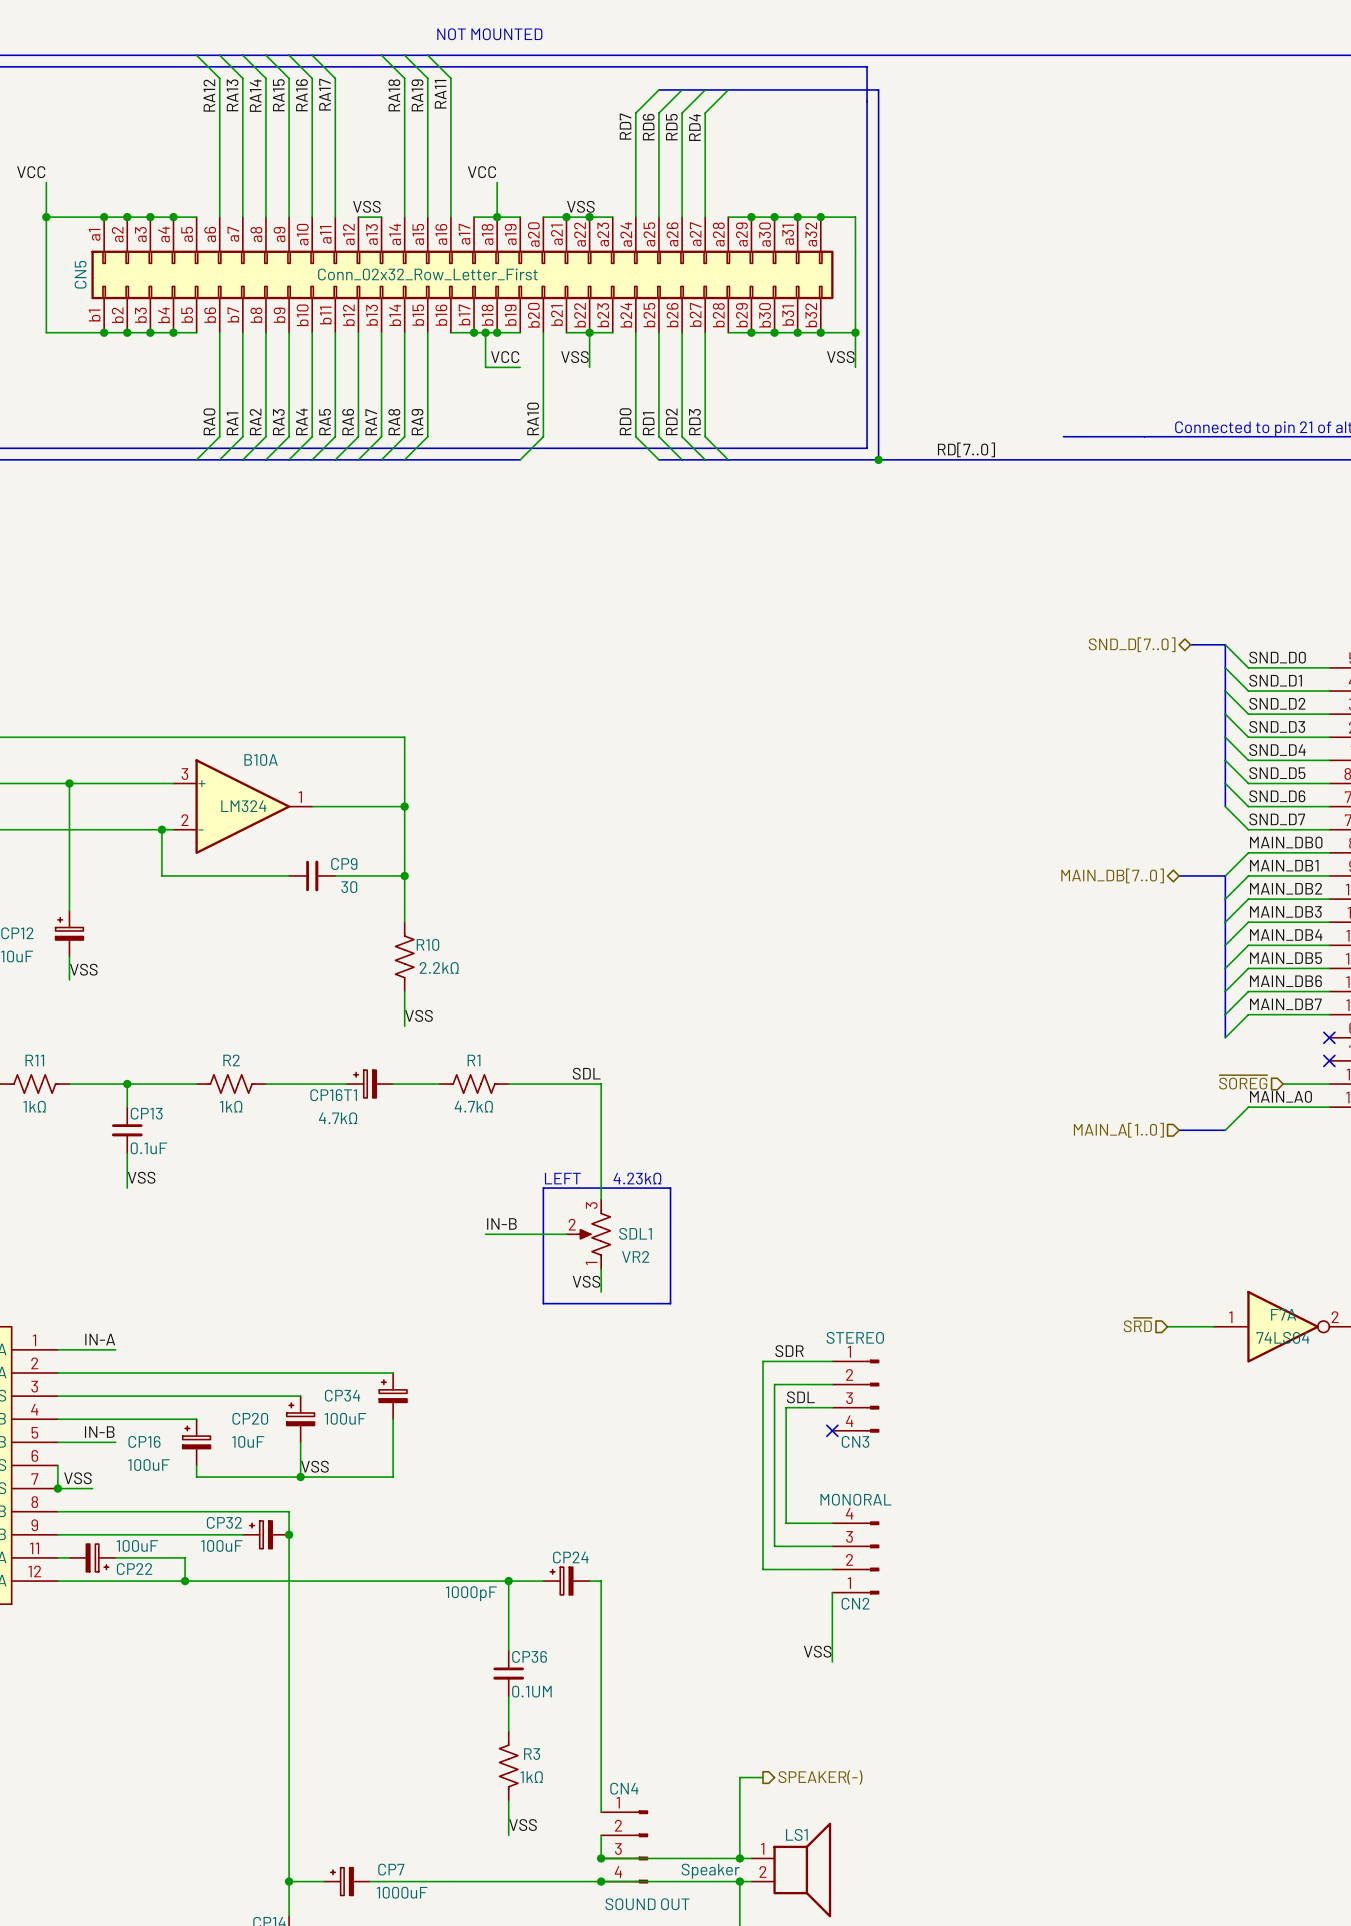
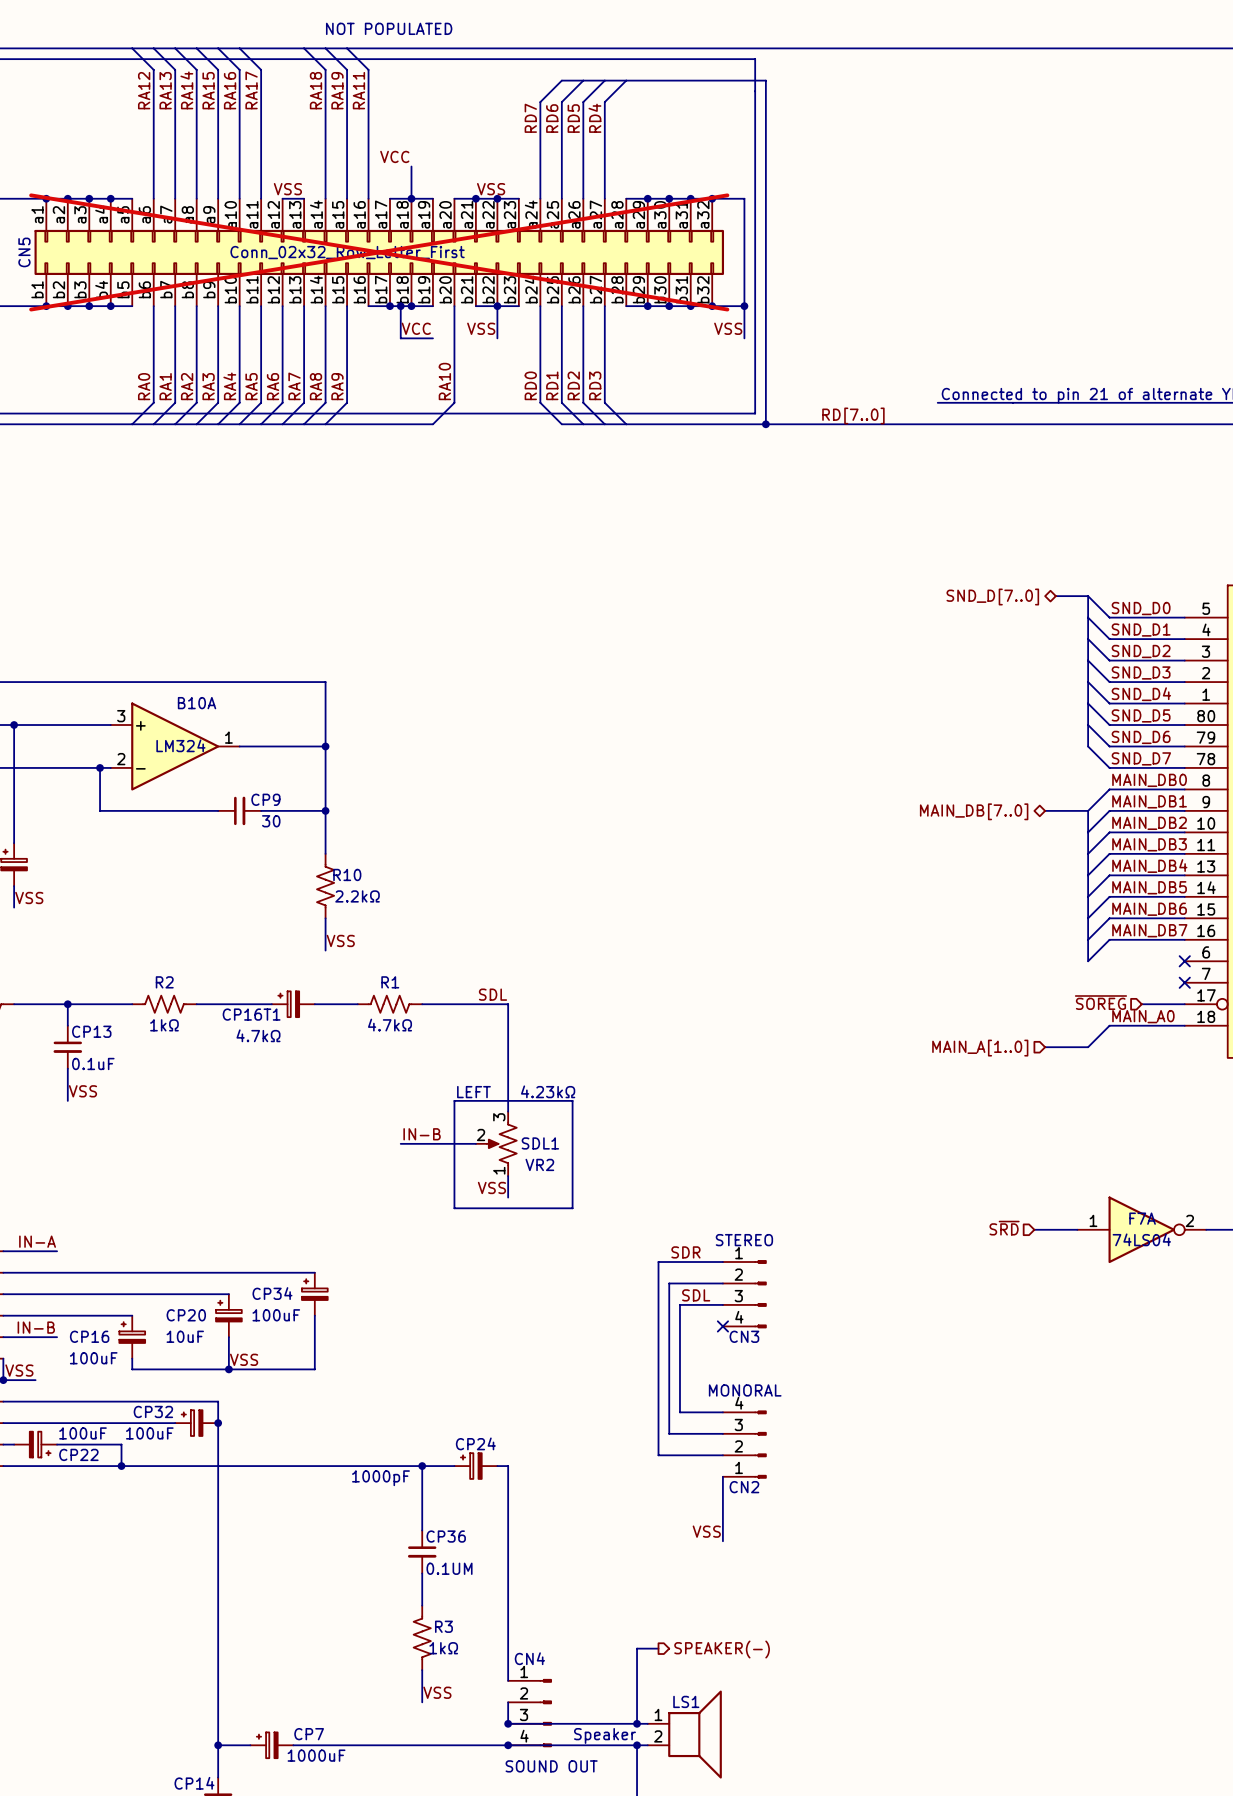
text: NOT MOUNTED (489, 34) -> NOT POPULATED (389, 28)
CN5 do-not-place cross: none -> (379, 252)

